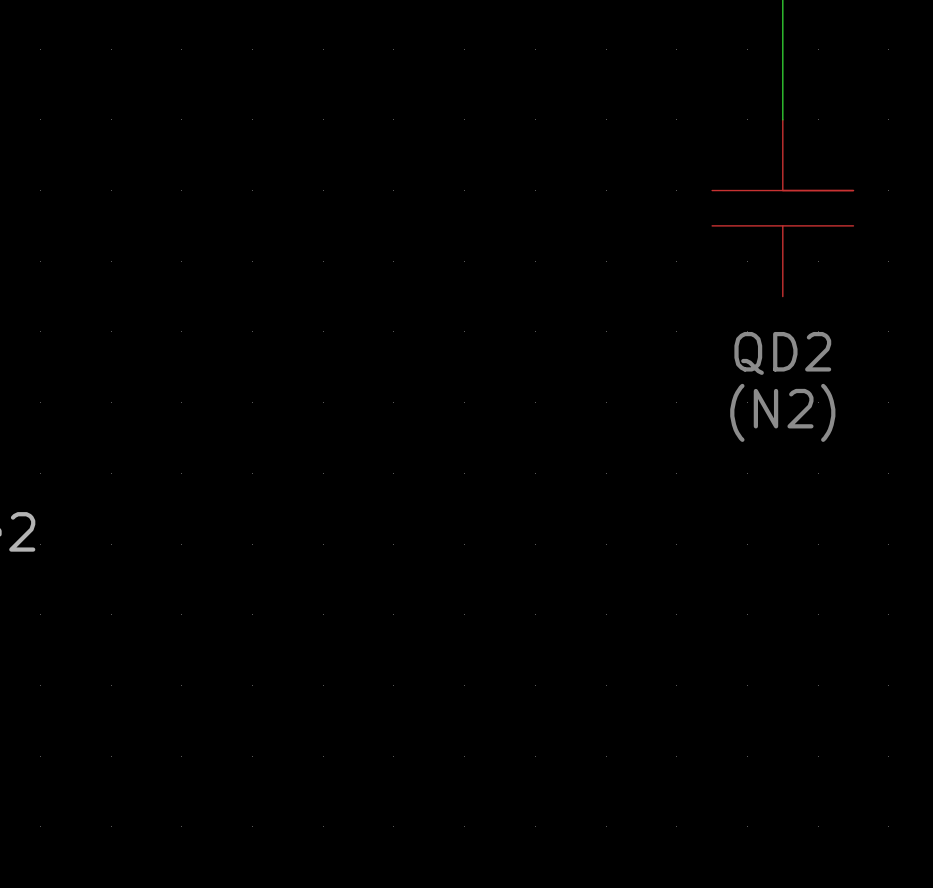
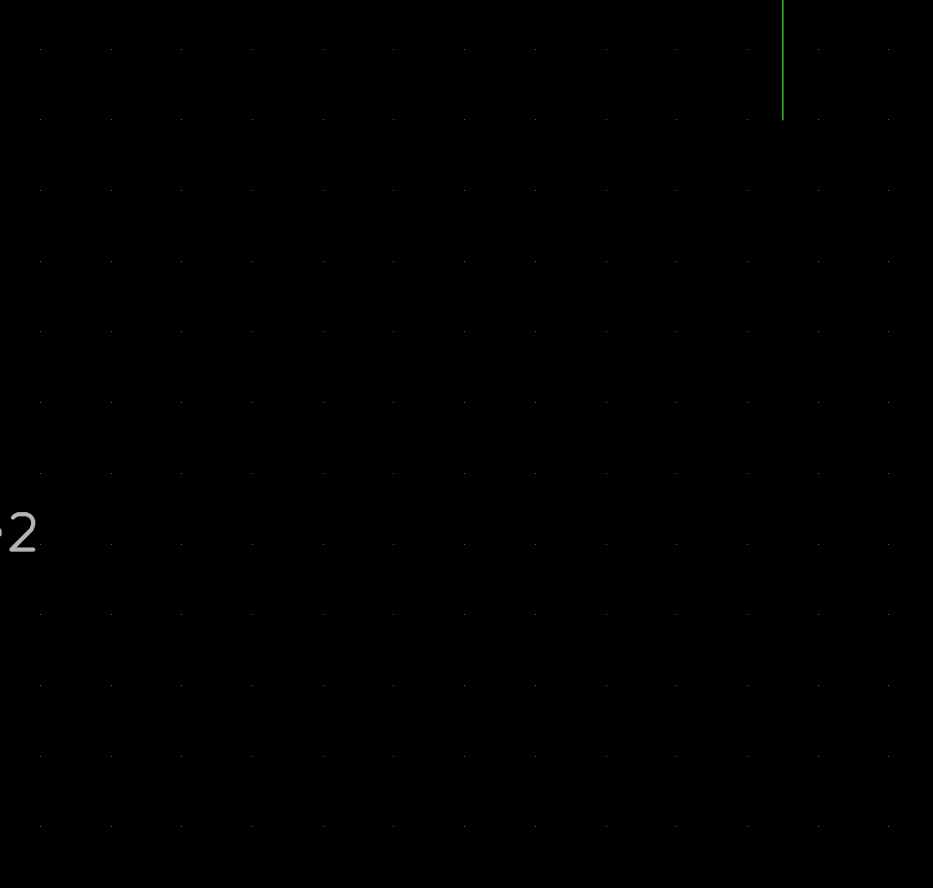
part: (782, 208) -> none
text: QD2 (782, 353) -> none
text: (N2) (782, 412) -> none

